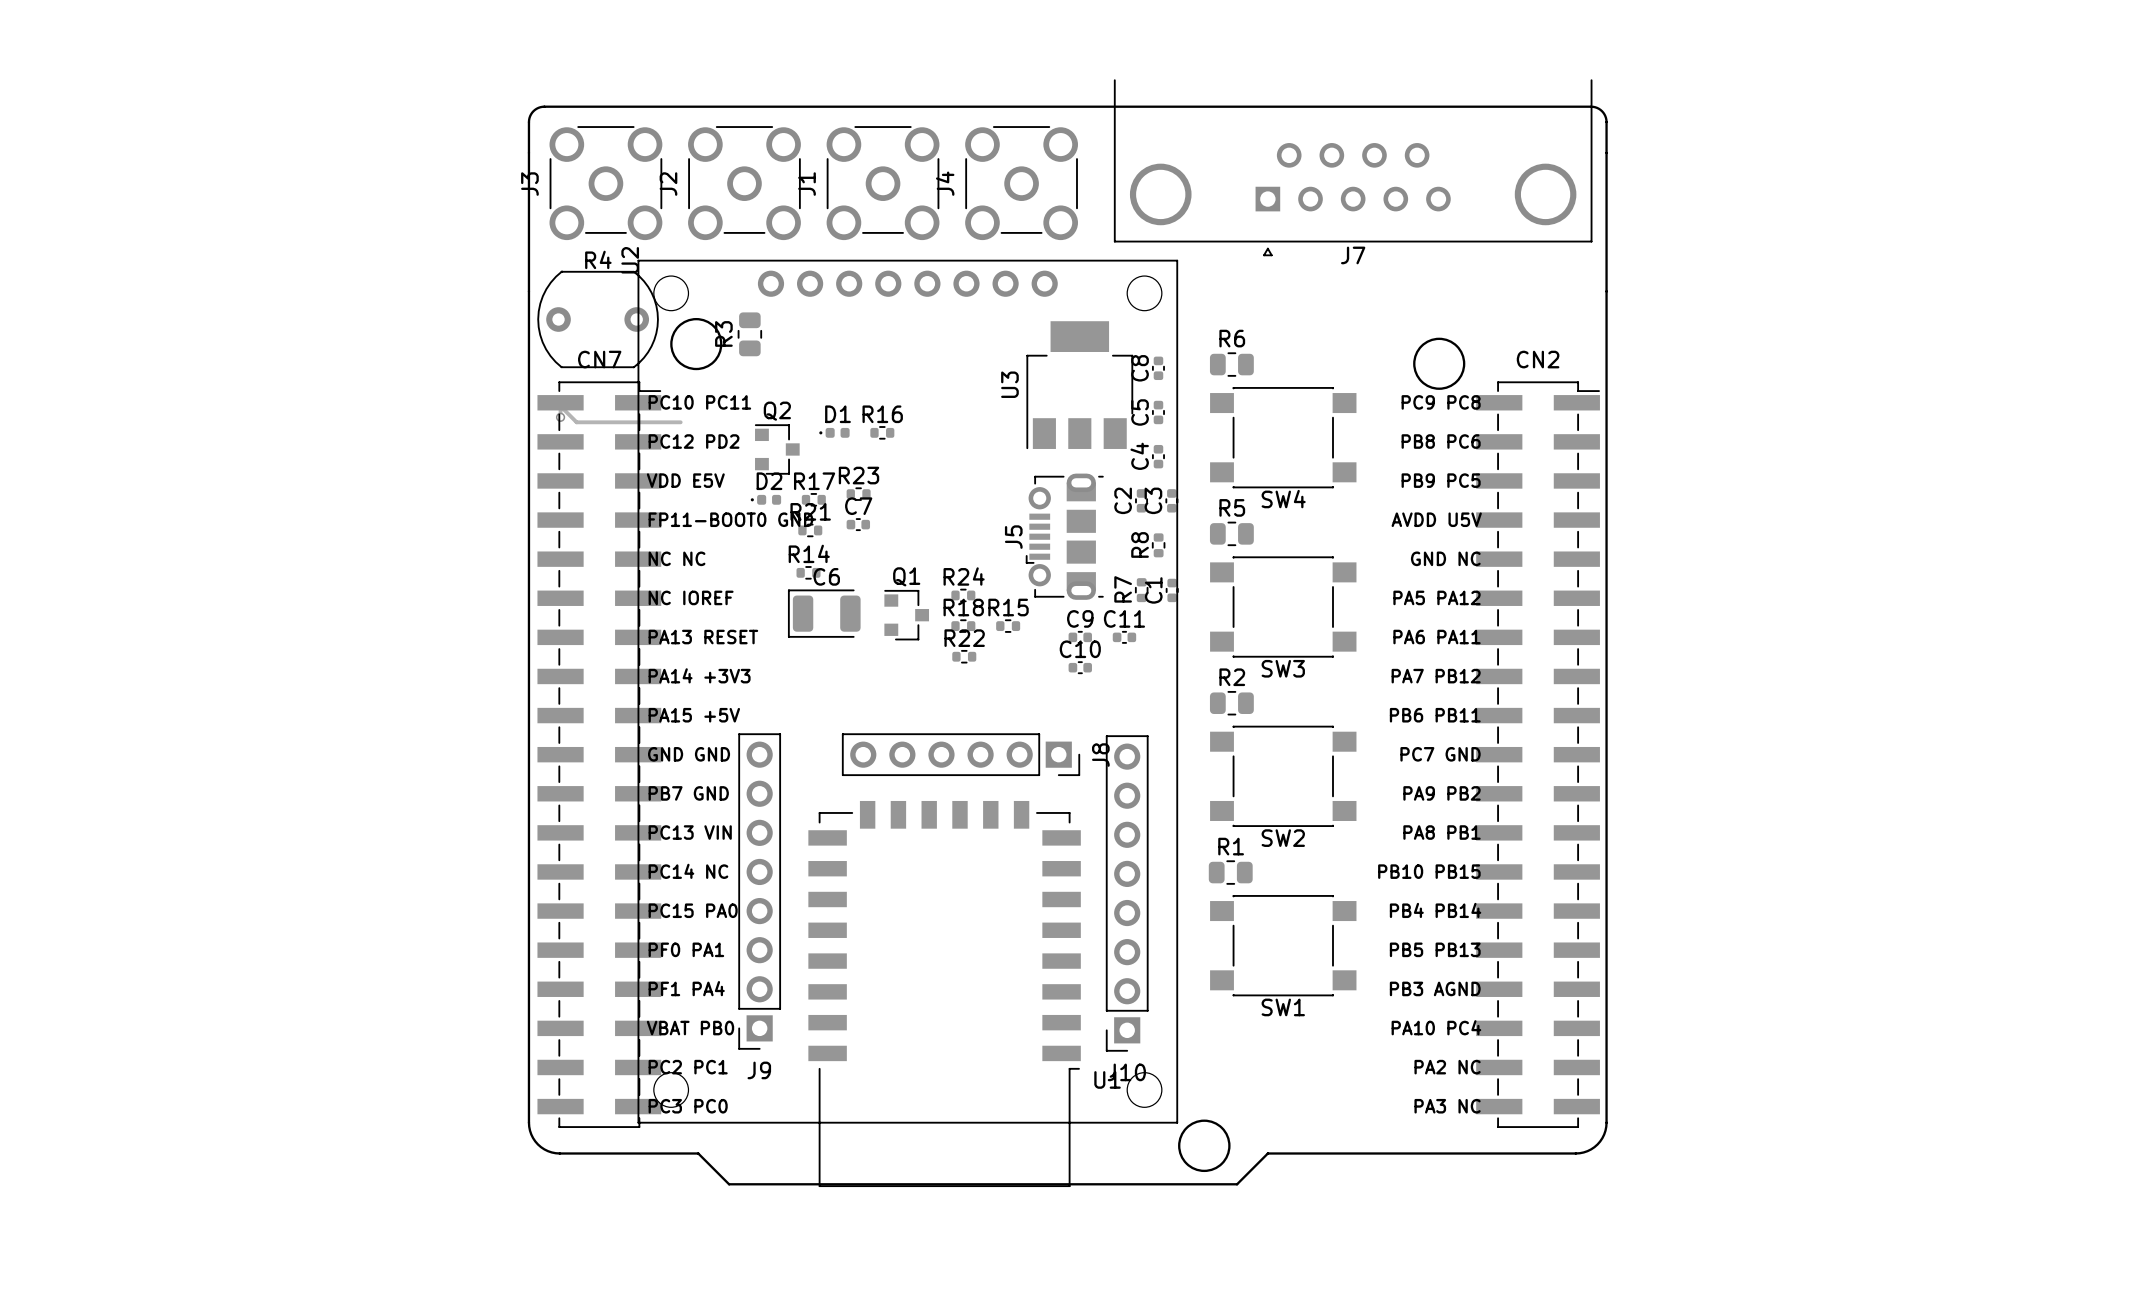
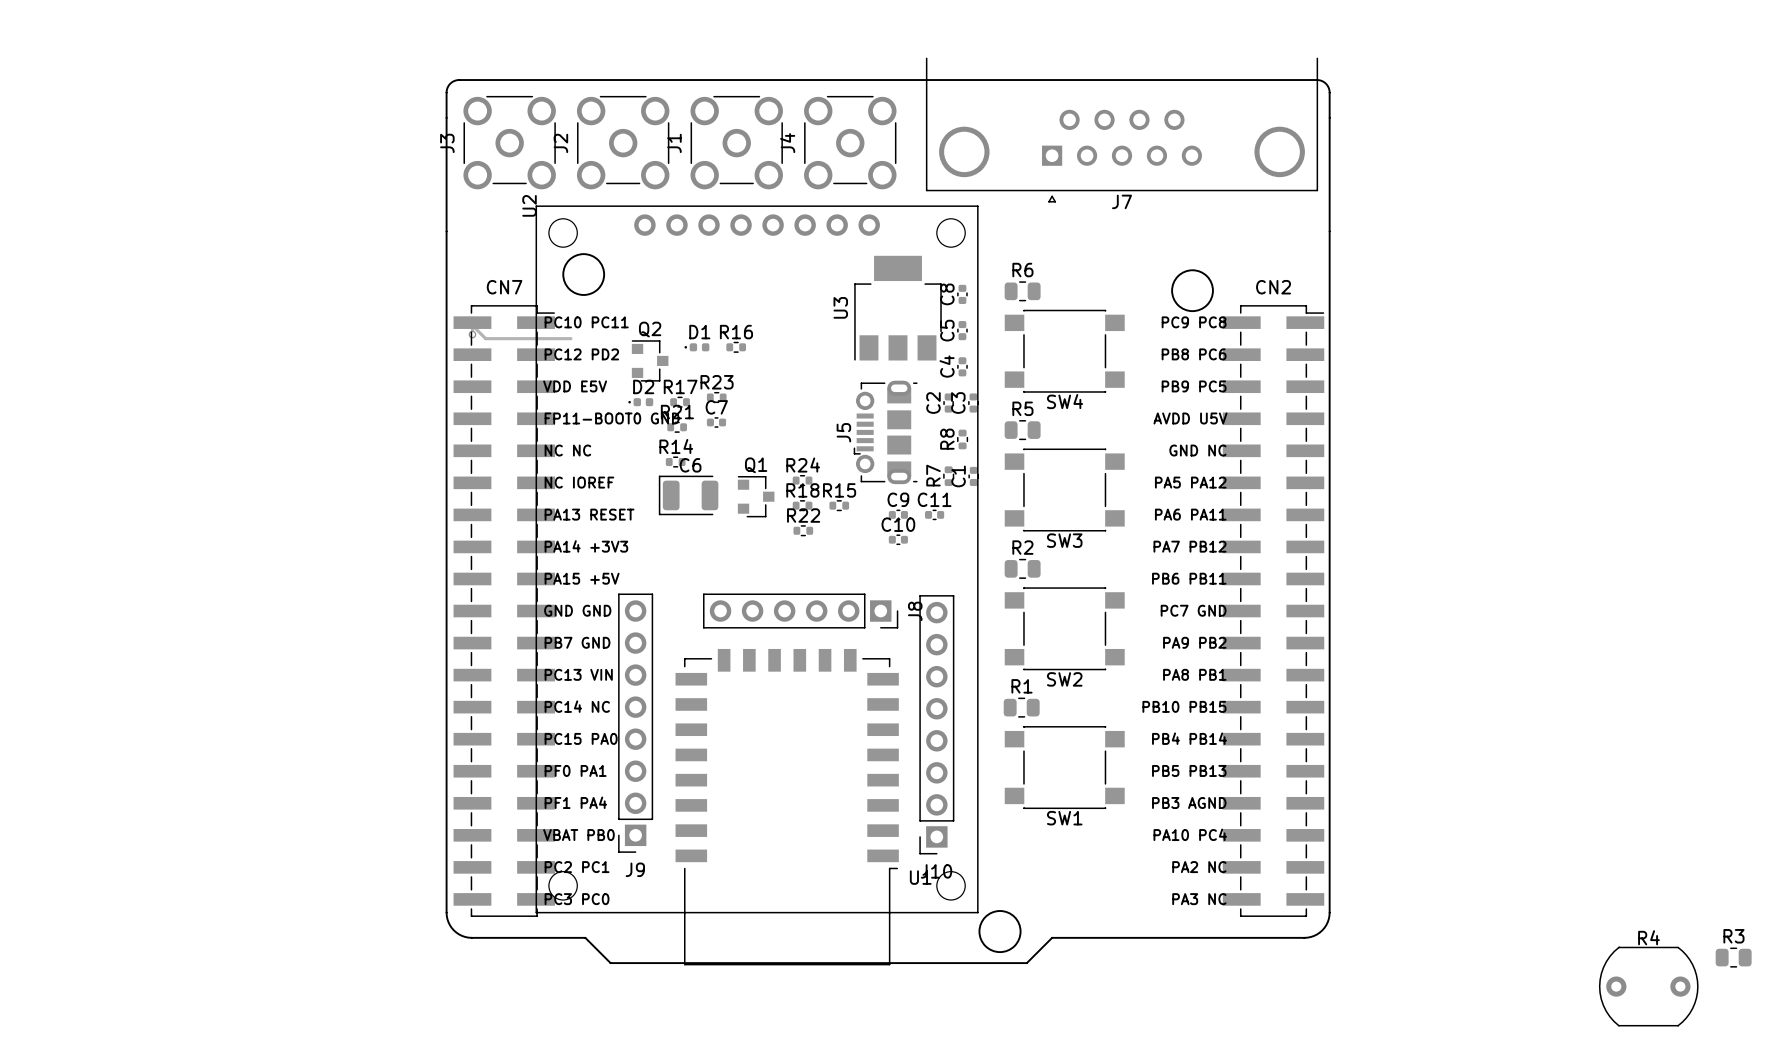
R4 position: (598, 319) -> (1648, 986)
R3 rotation: 0° (749, 334) -> 90° clockwise (1733, 957)
R3 position: (749, 334) -> (1733, 957)

